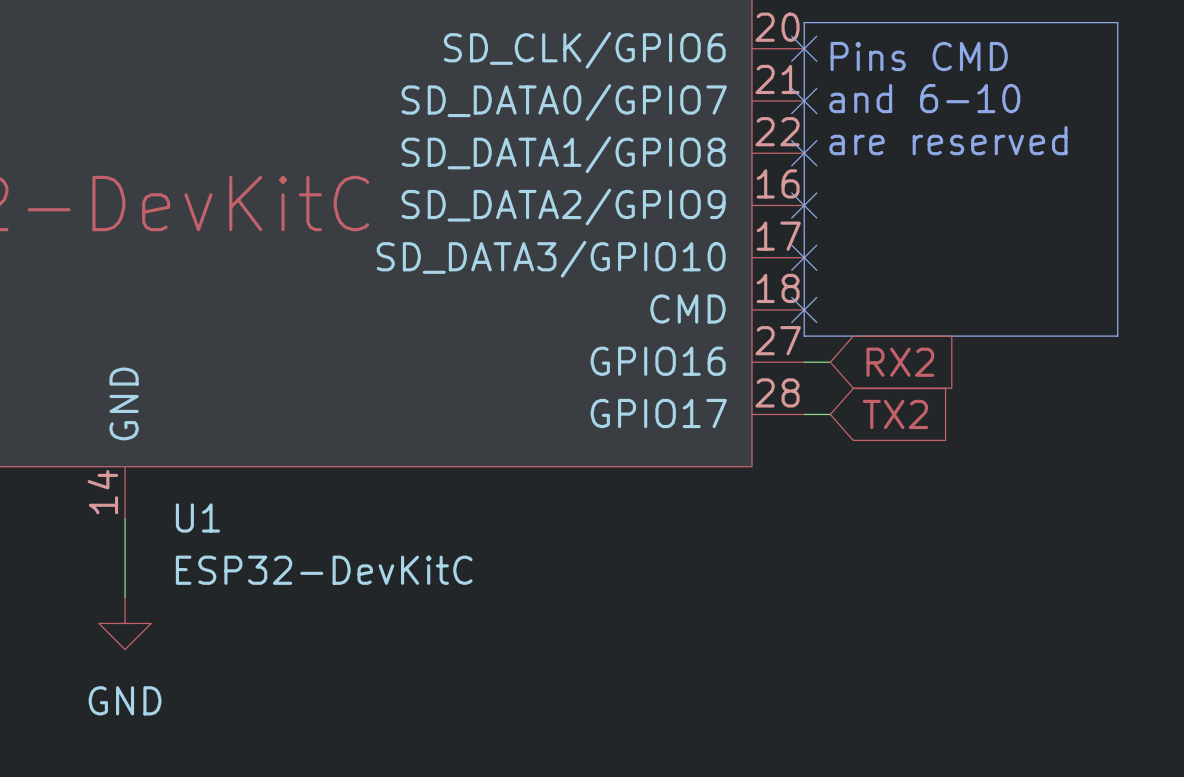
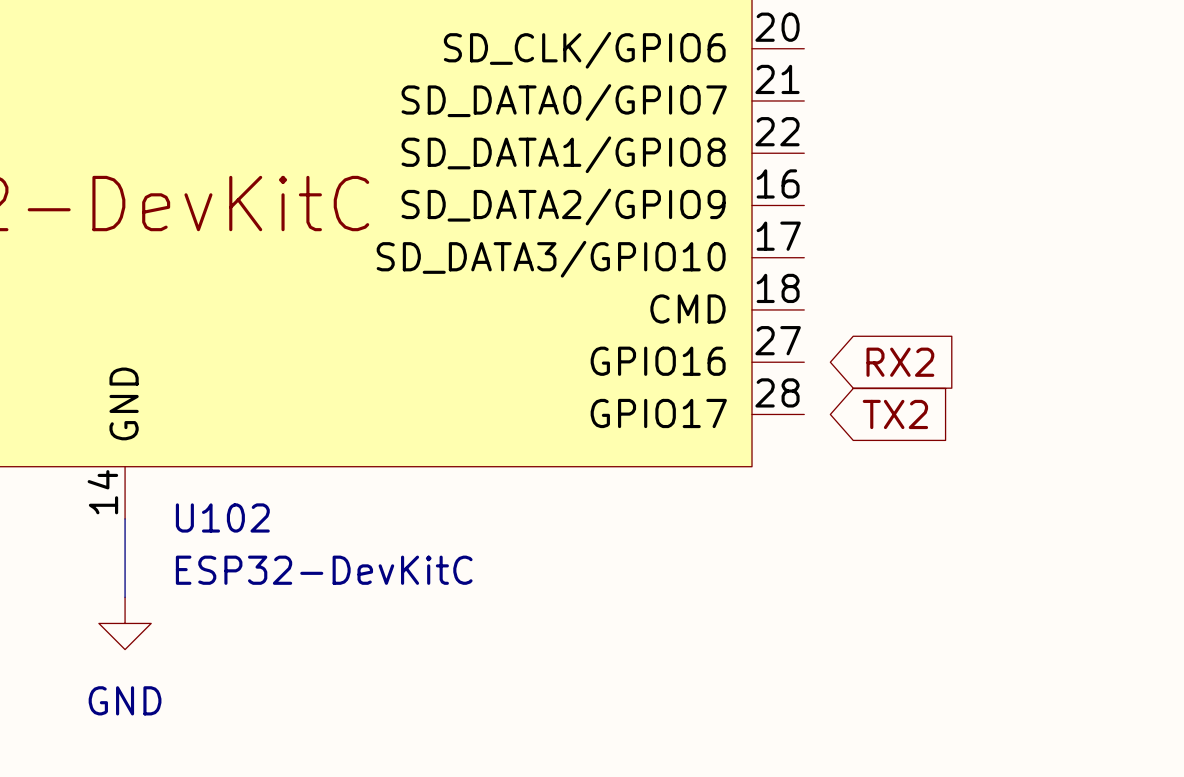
line: (804, 22) (1117, 22) (1117, 336) (804, 336) (804, 22) -> none
no-connect mark: (804, 48) -> none
text: Pins CMD (919, 56) -> none
text: and 6-10 (924, 98) -> none
no-connect mark: (804, 100) -> none
text: are reserved (948, 140) -> none
no-connect mark: (804, 153) -> none
no-connect mark: (804, 205) -> none
no-connect mark: (804, 257) -> none
no-connect mark: (804, 309) -> none
wire: (804, 362) (830, 362) -> none
wire: (804, 414) (830, 414) -> none
U1 name: U1 (197, 517) -> U102 (222, 517)

